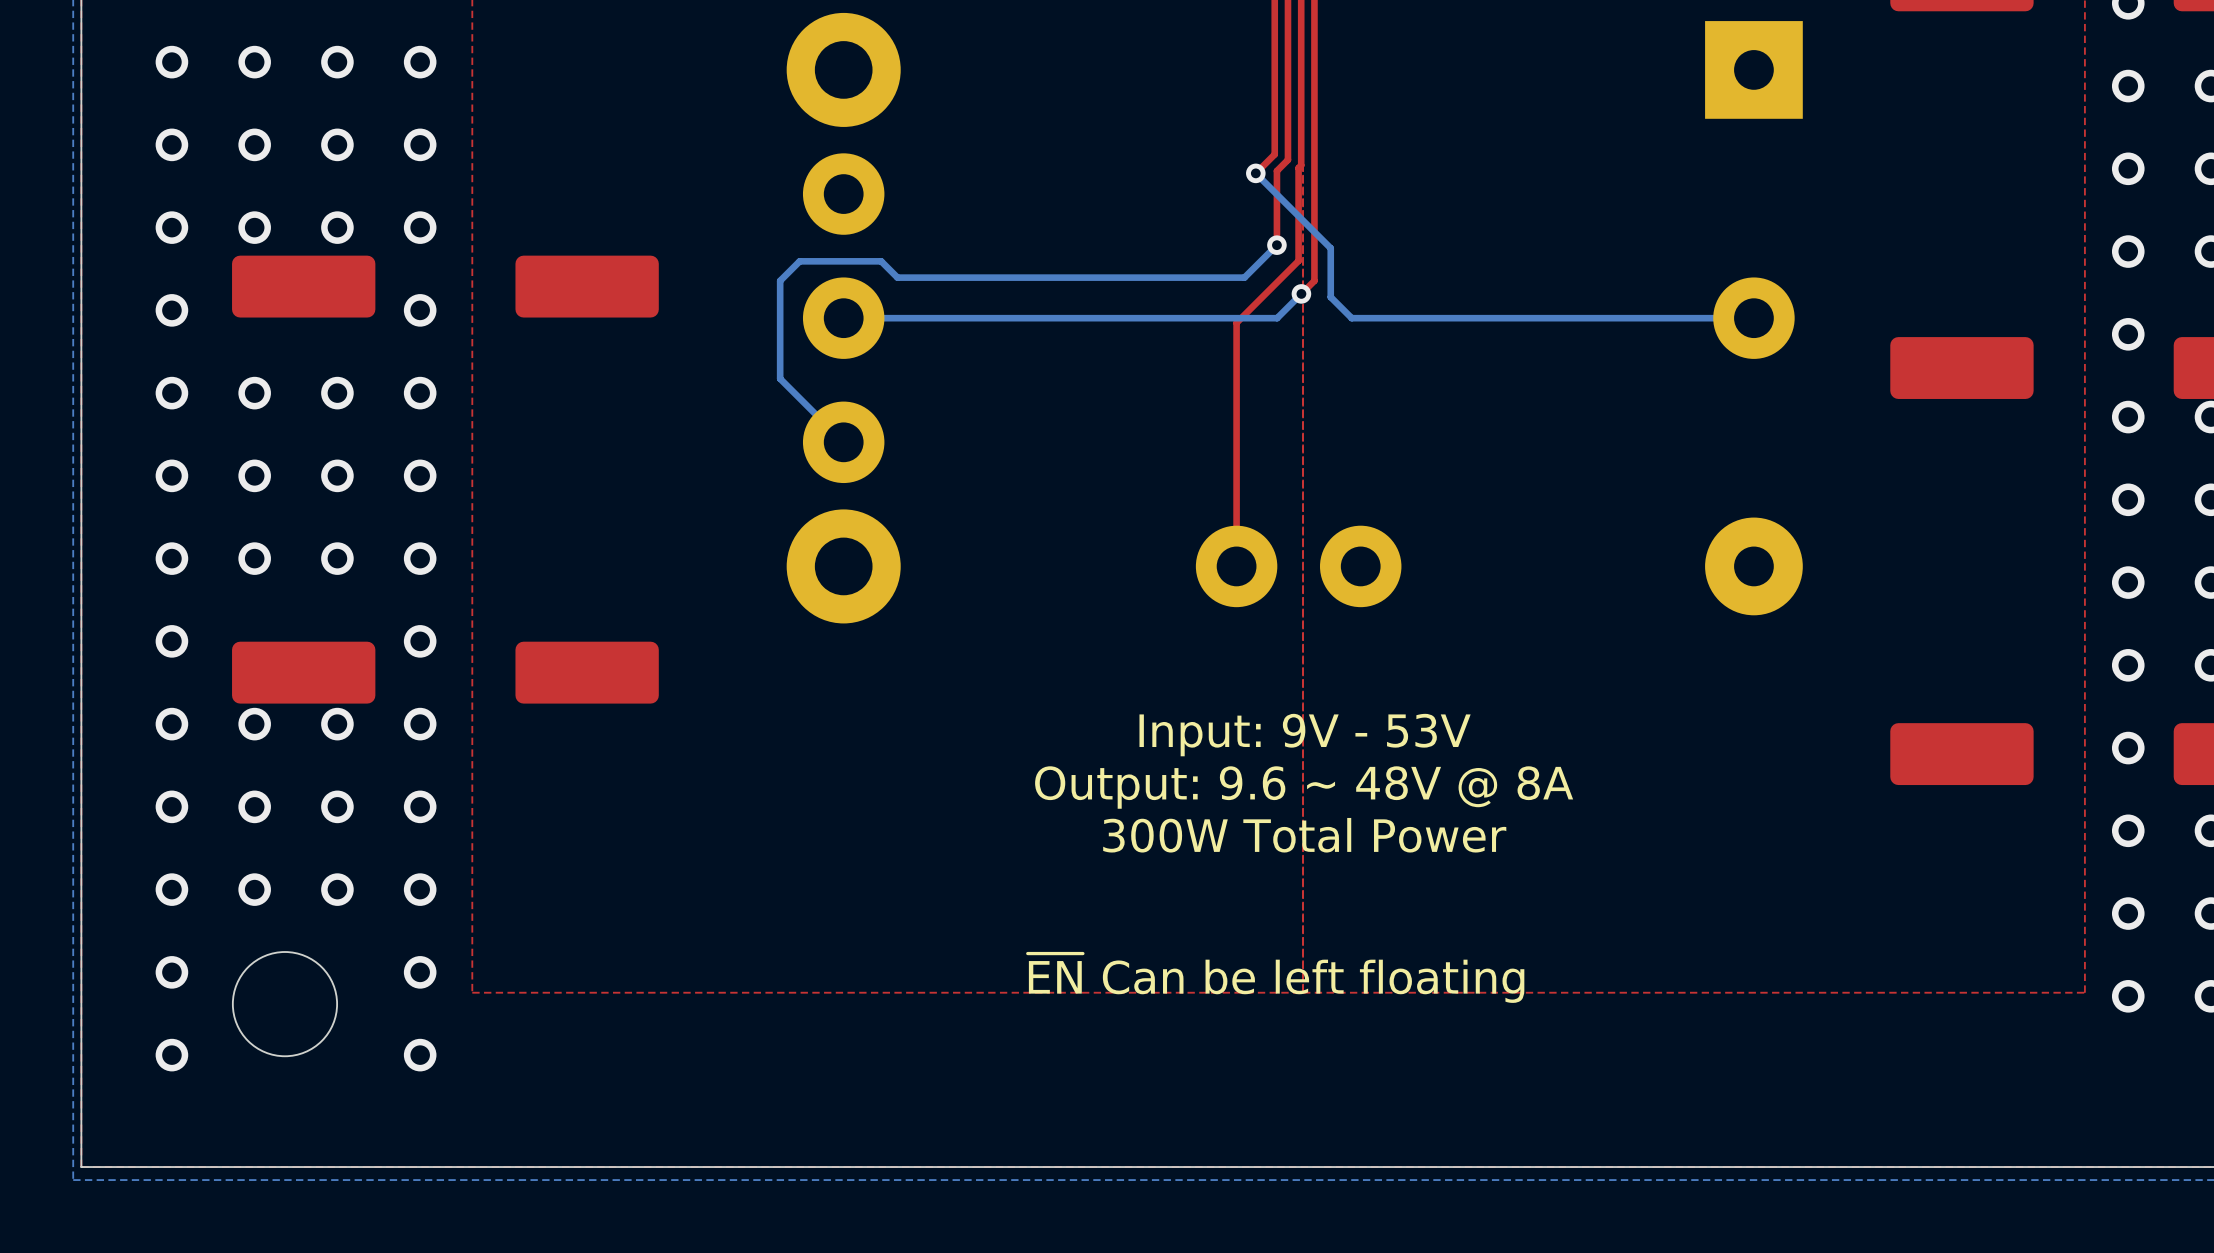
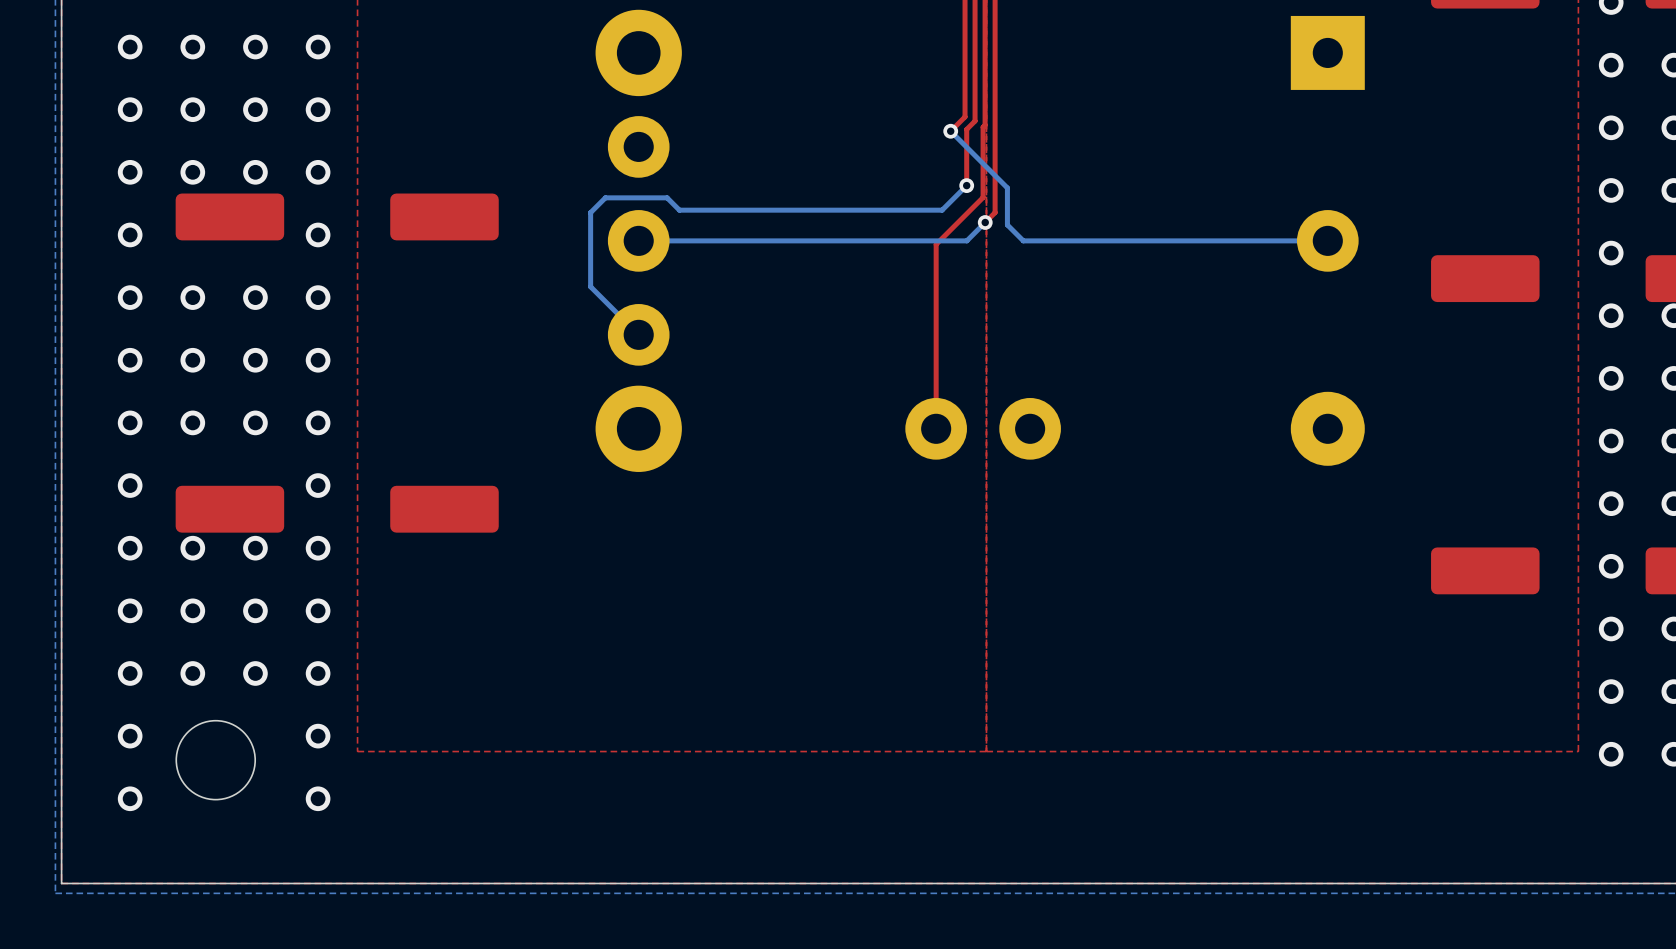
text: Input: 9V - 53V (1305, 735) -> none
text: Output: 9.6 ~ 48V @ 8A (1304, 787) -> none
text: 300W Total Power (1304, 835) -> none
text: ~{EN} Can be left floating (1276, 978) -> none

